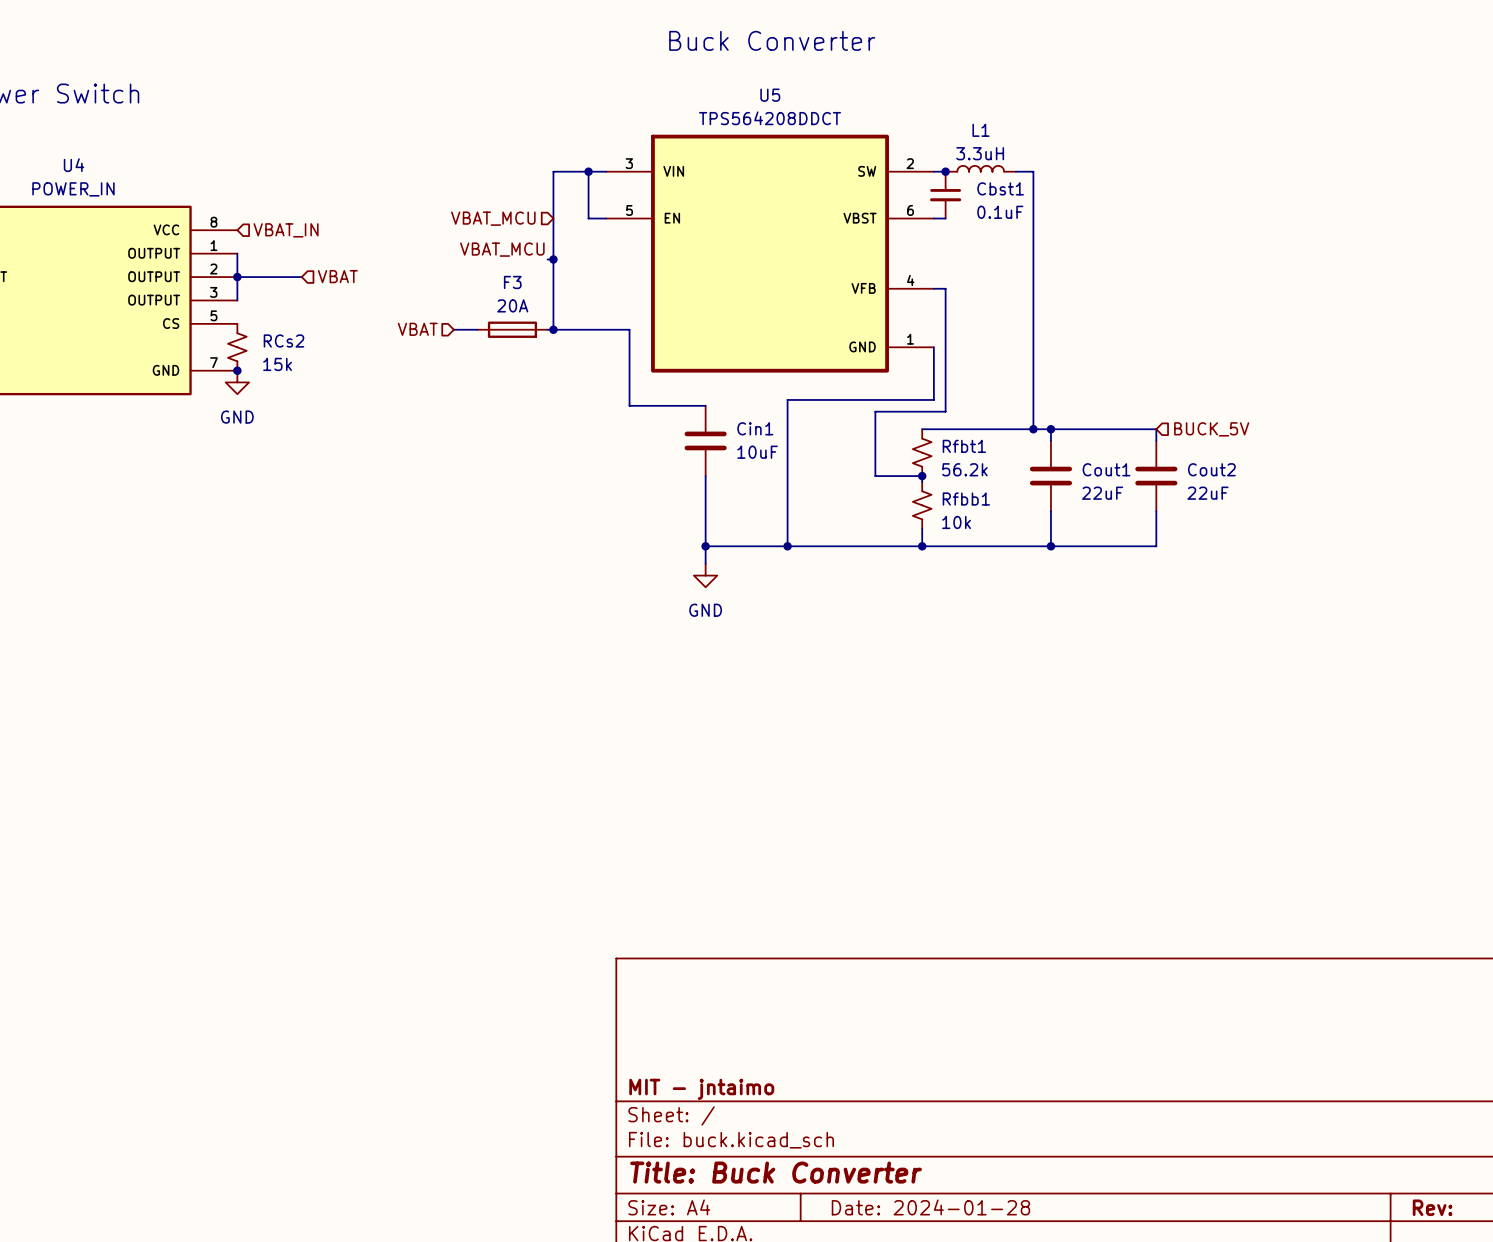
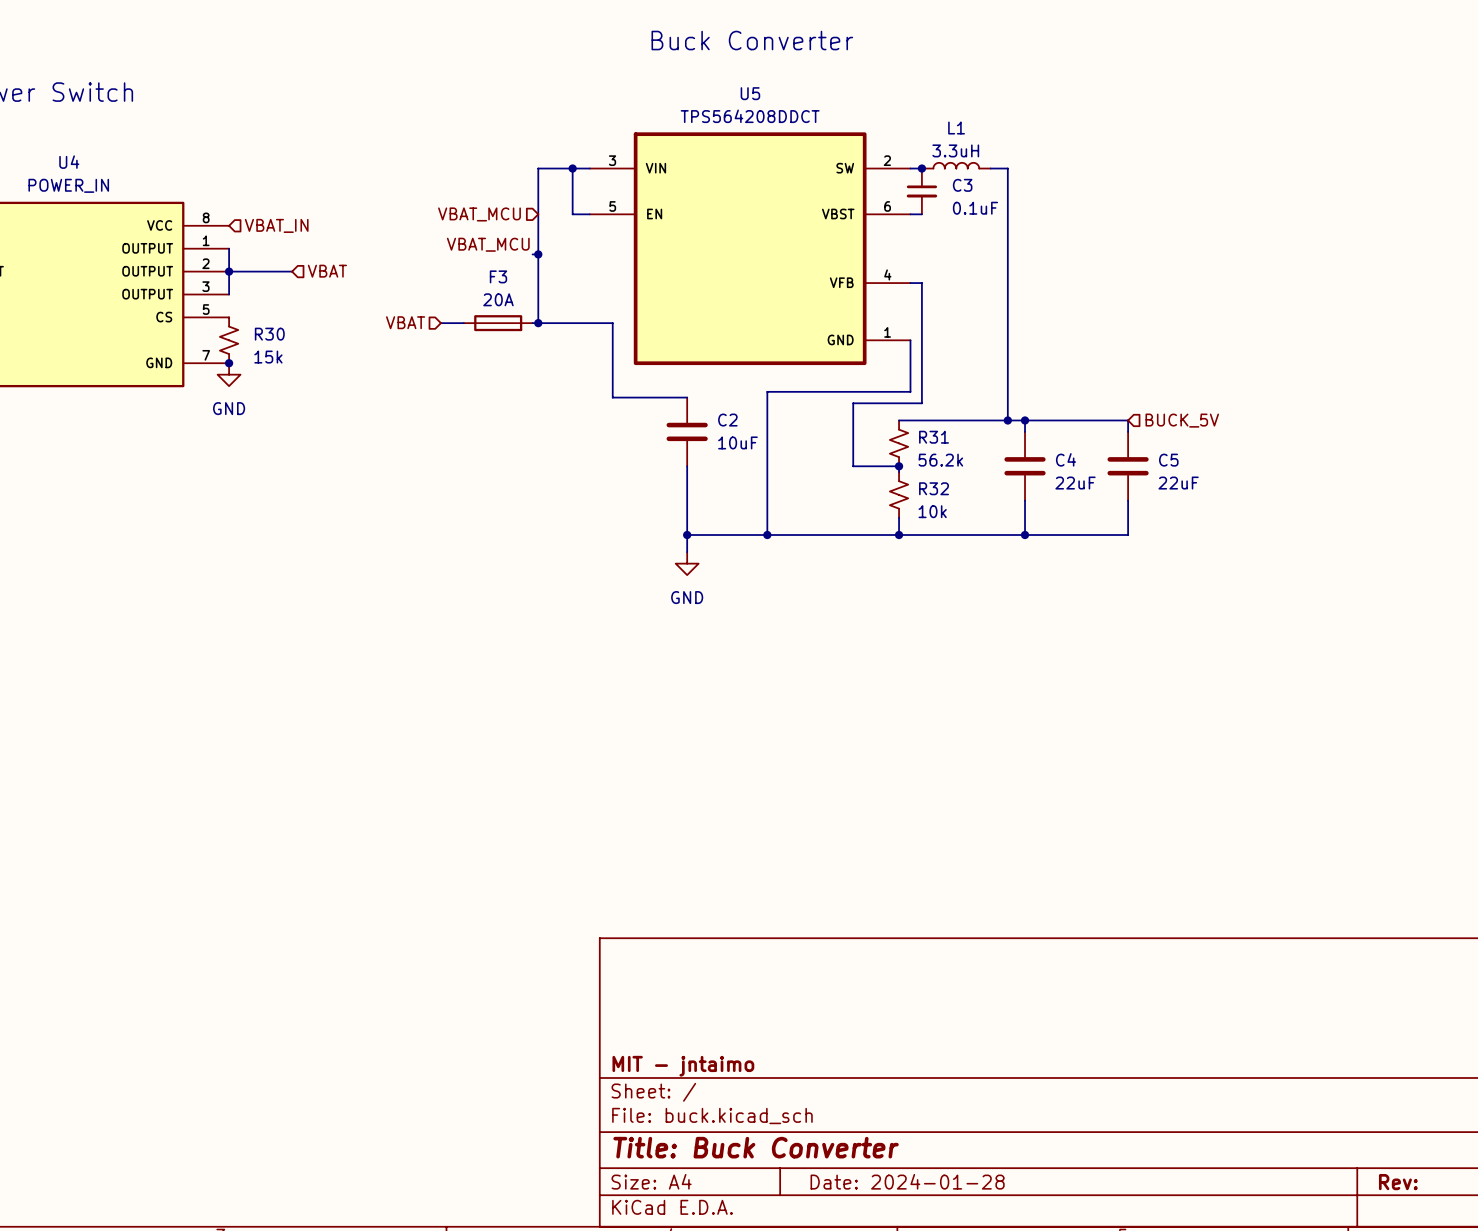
Cbst1 name: Cbst1 (1000, 188) -> C3 (962, 185)
RCs2 name: RCs2 (284, 341) -> R30 (269, 334)
Cin1 name: Cin1 (755, 428) -> C2 (727, 420)
Rfbt1 name: Rfbt1 (964, 446) -> R31 (934, 437)
Cout1 name: Cout1 (1106, 469) -> C4 (1066, 459)
Cout2 name: Cout2 (1211, 469) -> C5 (1168, 460)
Rfbb1 name: Rfbb1 (966, 499) -> R32 (934, 488)

